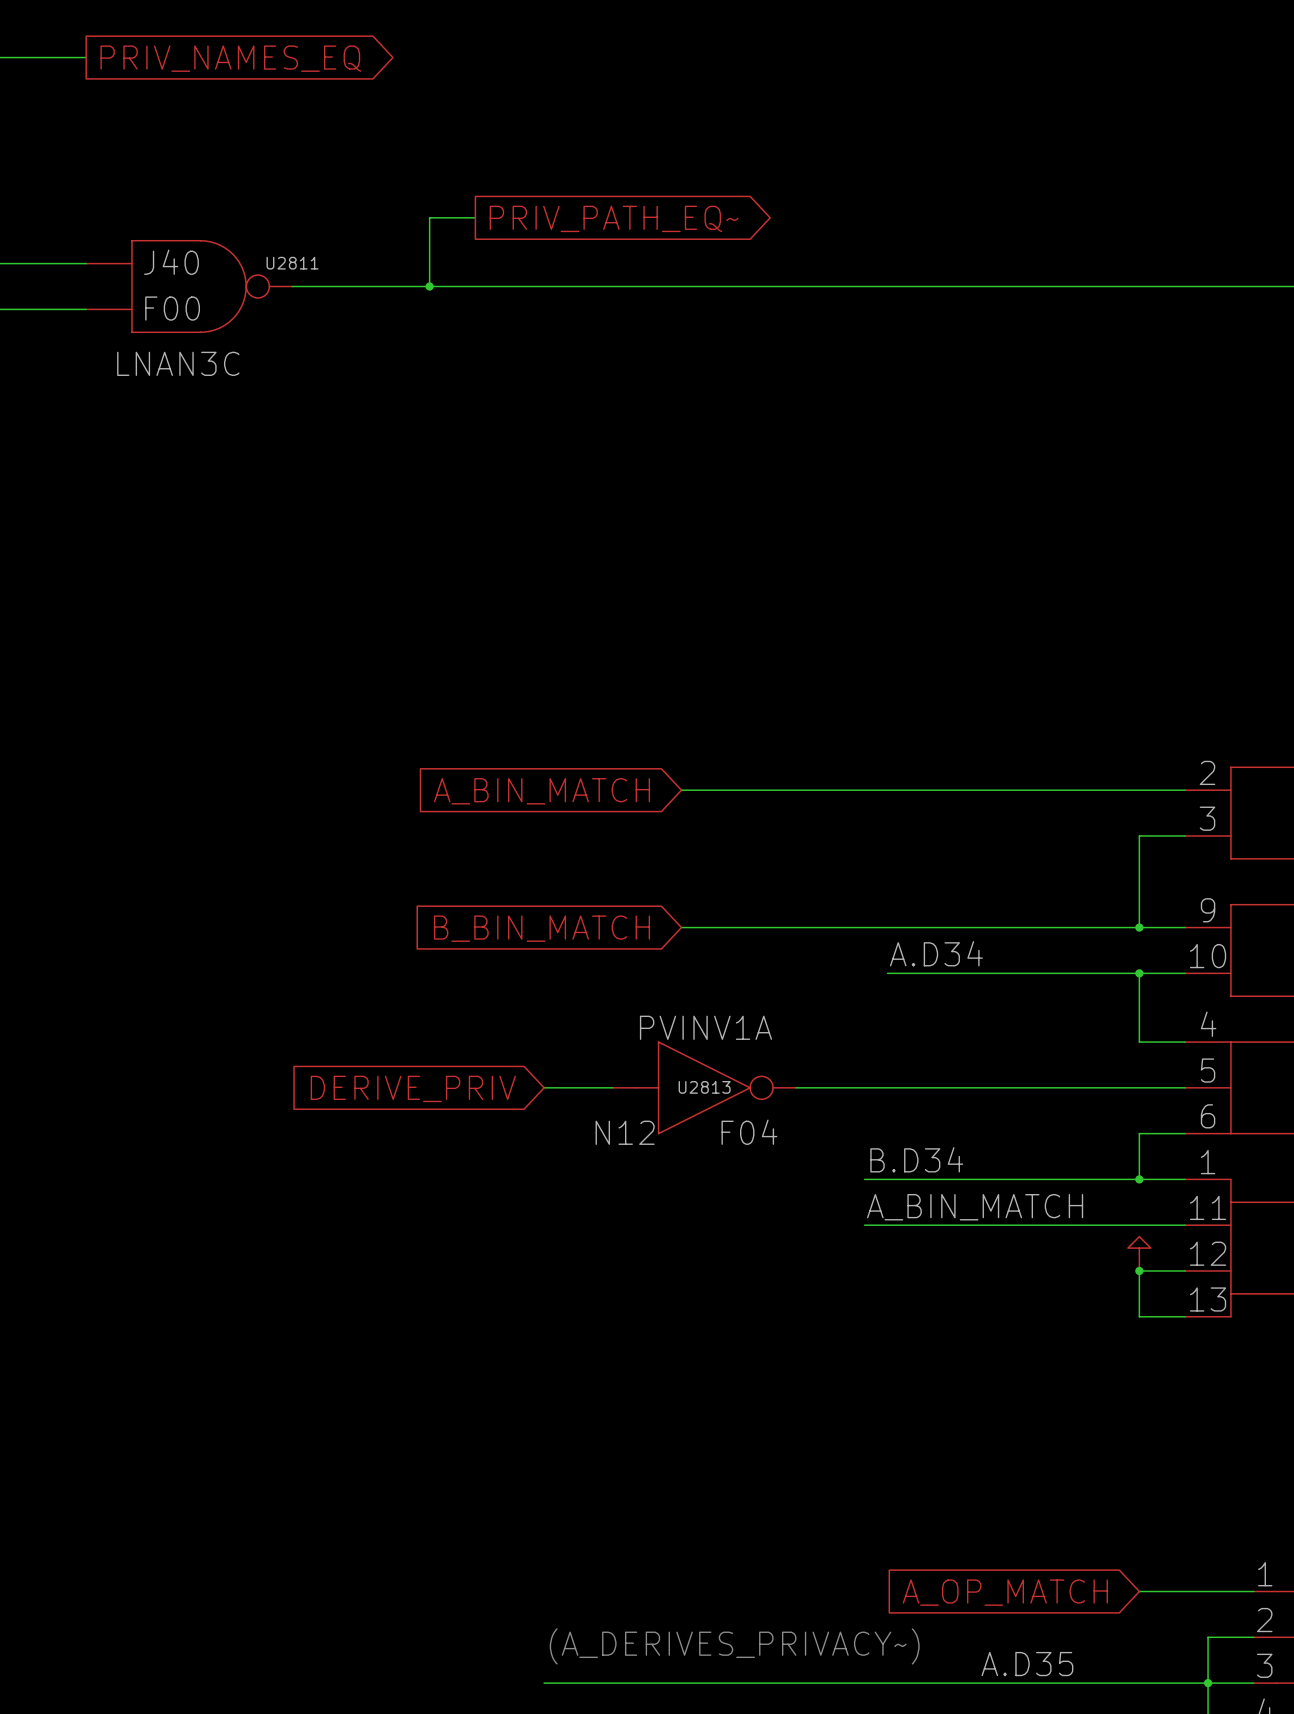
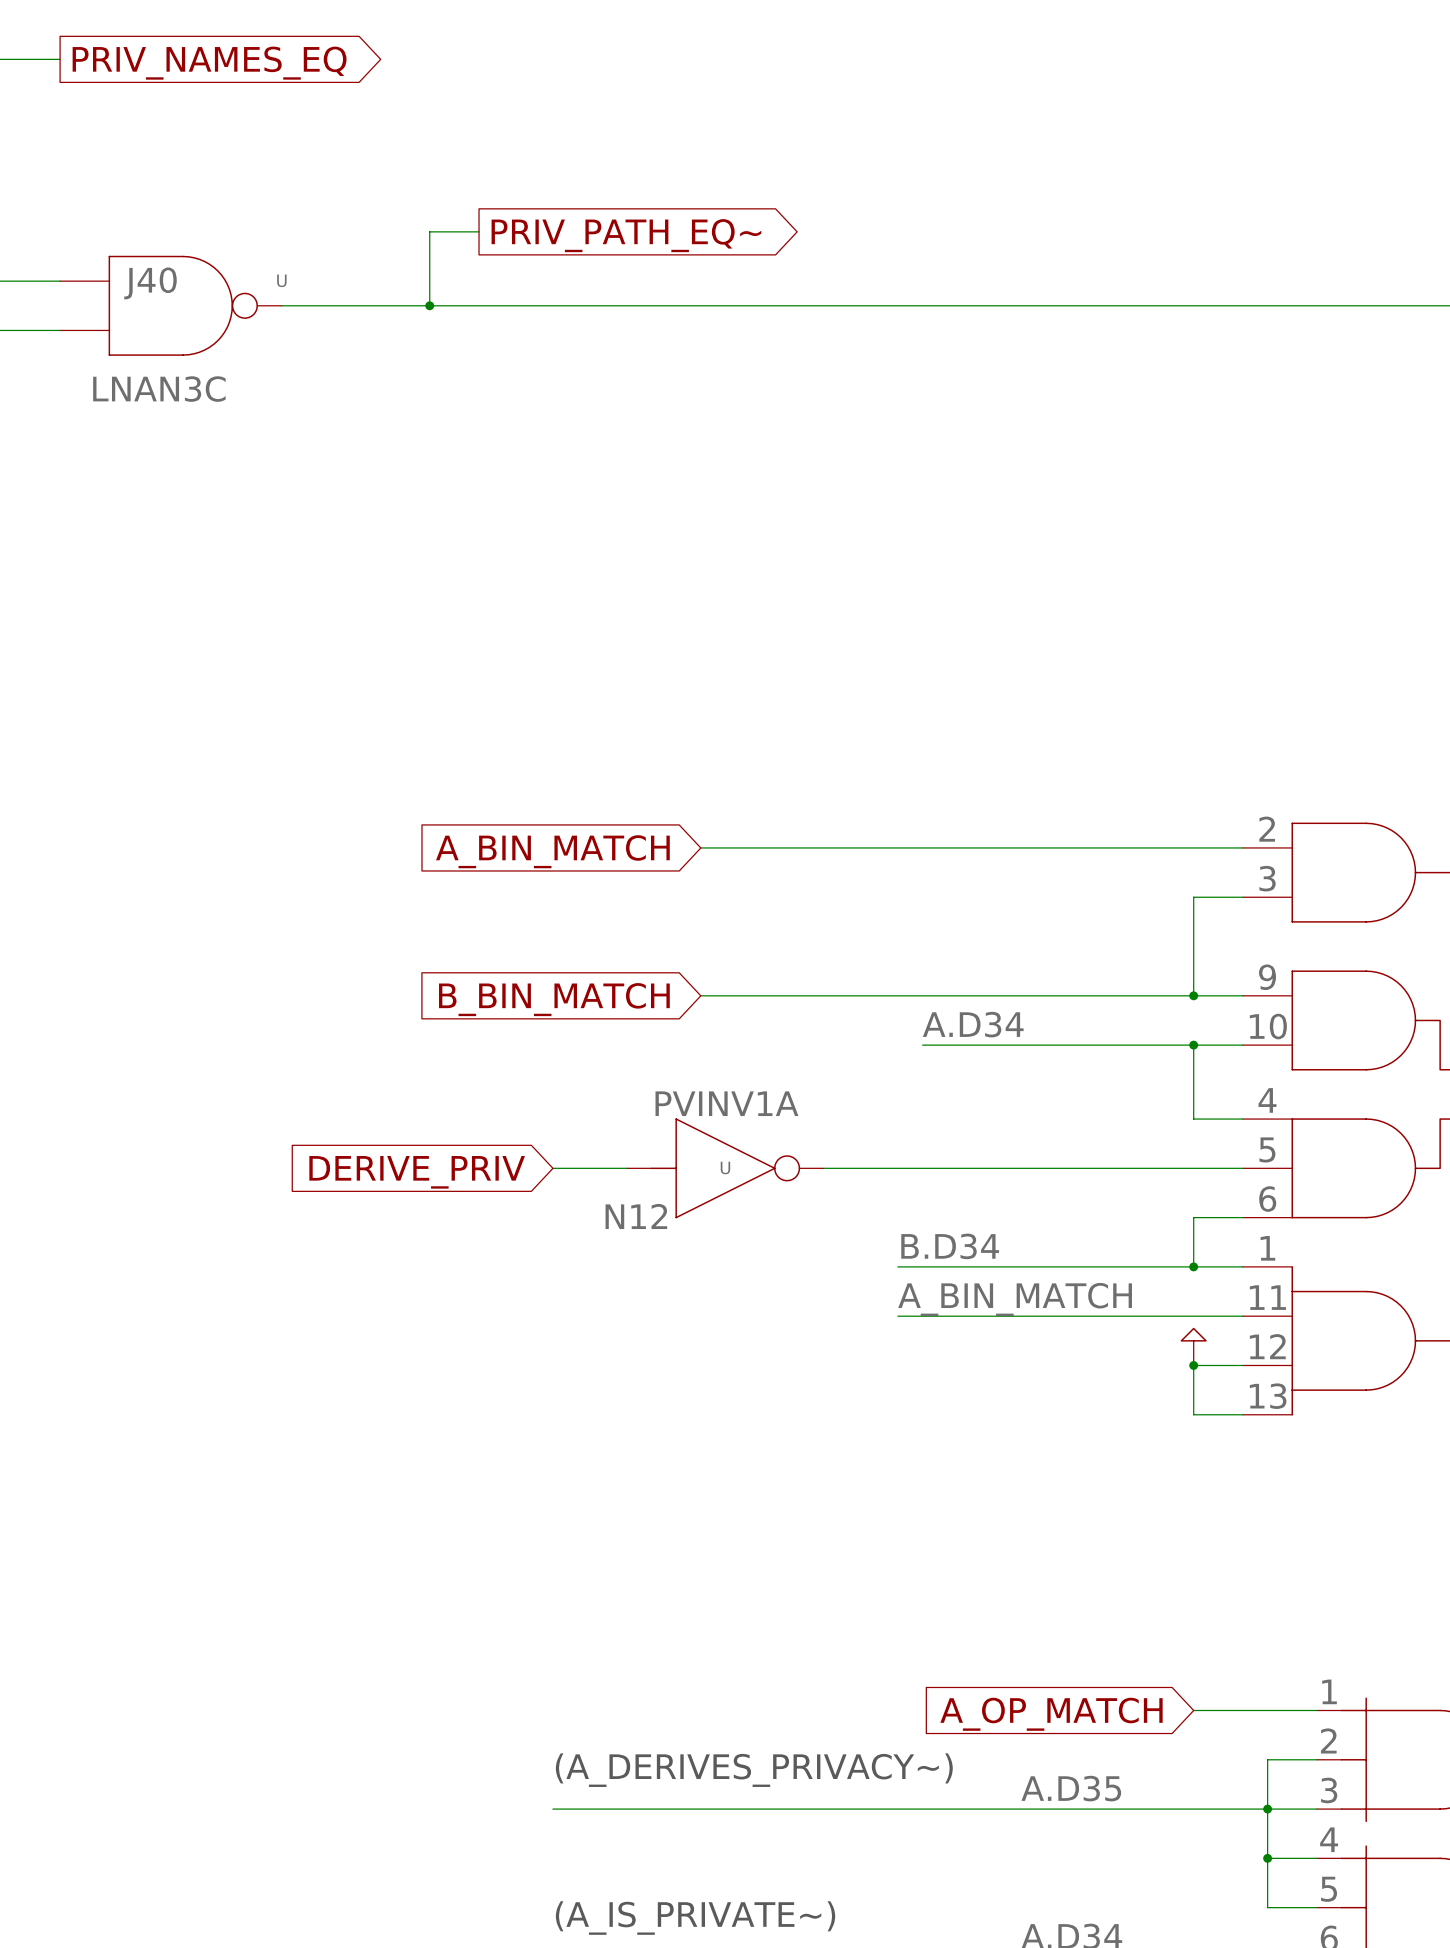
U2811 name: U2811 (292, 263) -> U (281, 280)
U2811 value: F00 (172, 308) -> none
U2813 name: U2813 (704, 1087) -> U (725, 1167)
U2813 value: F04 (749, 1132) -> none

